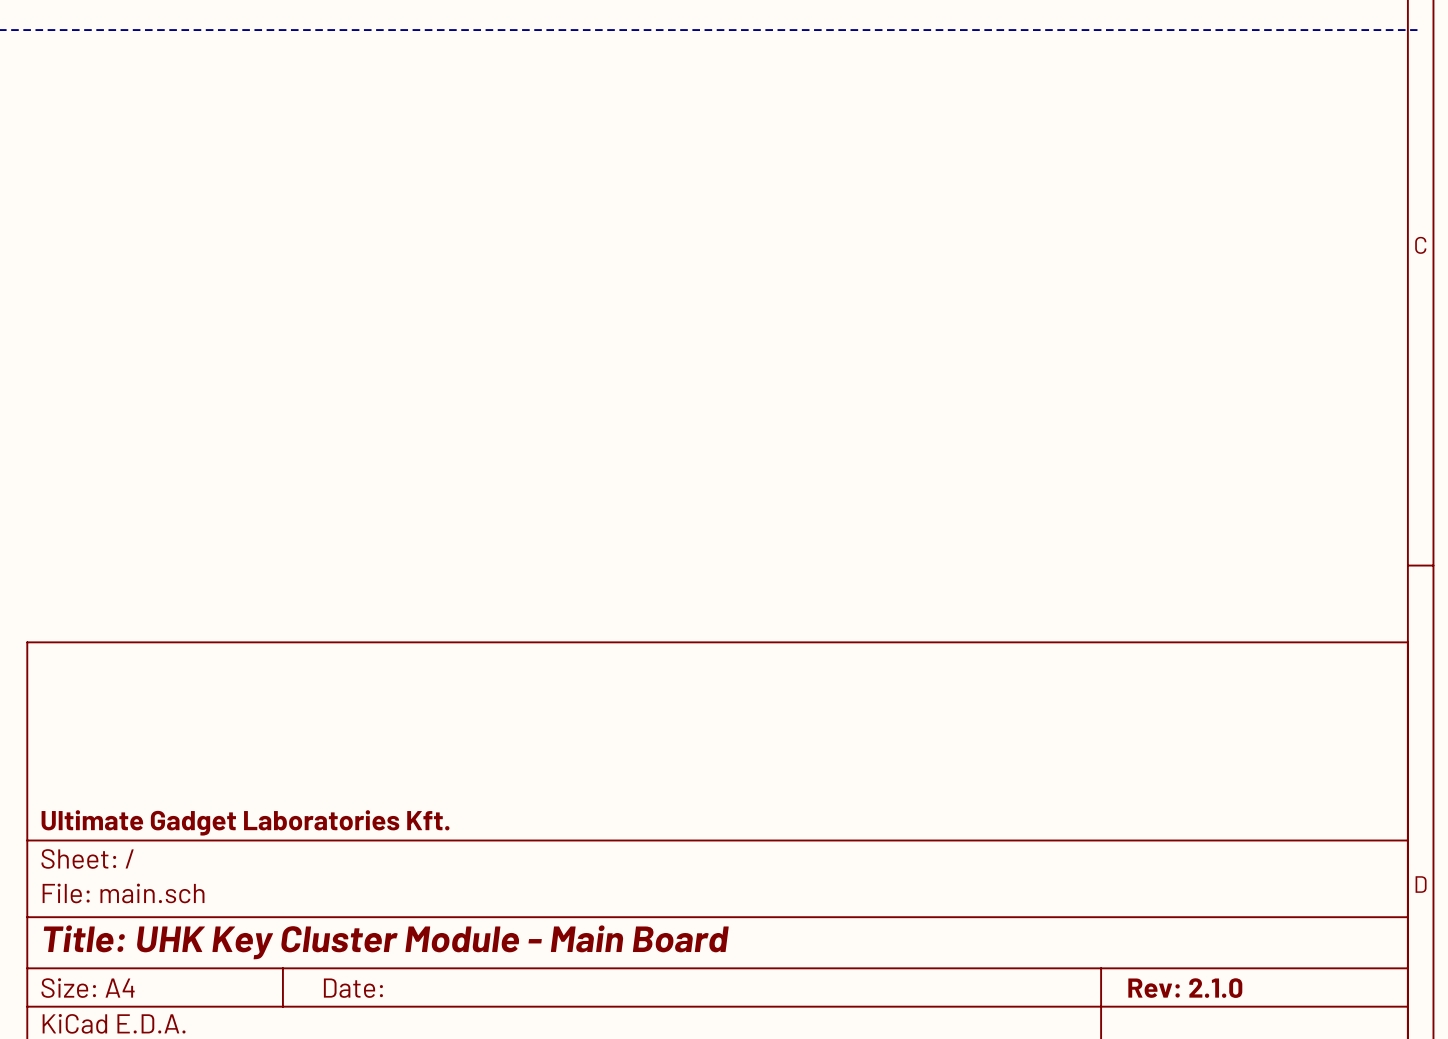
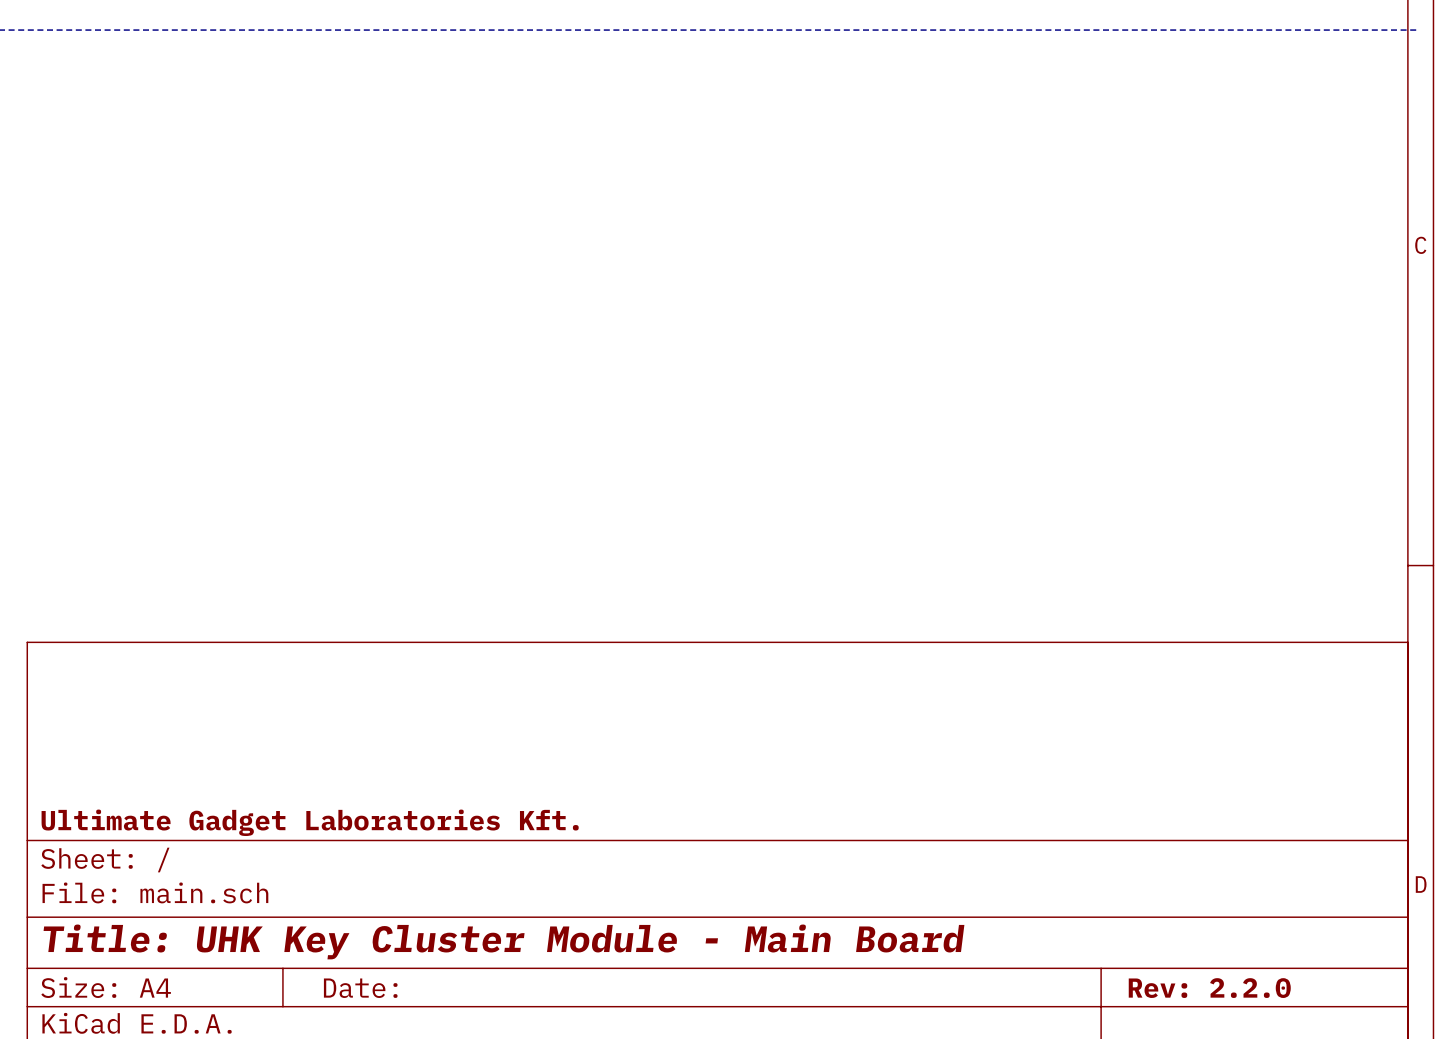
title block: Rev: 2.1.0 (1185, 988) -> Rev: 2.2.0 (1209, 988)

